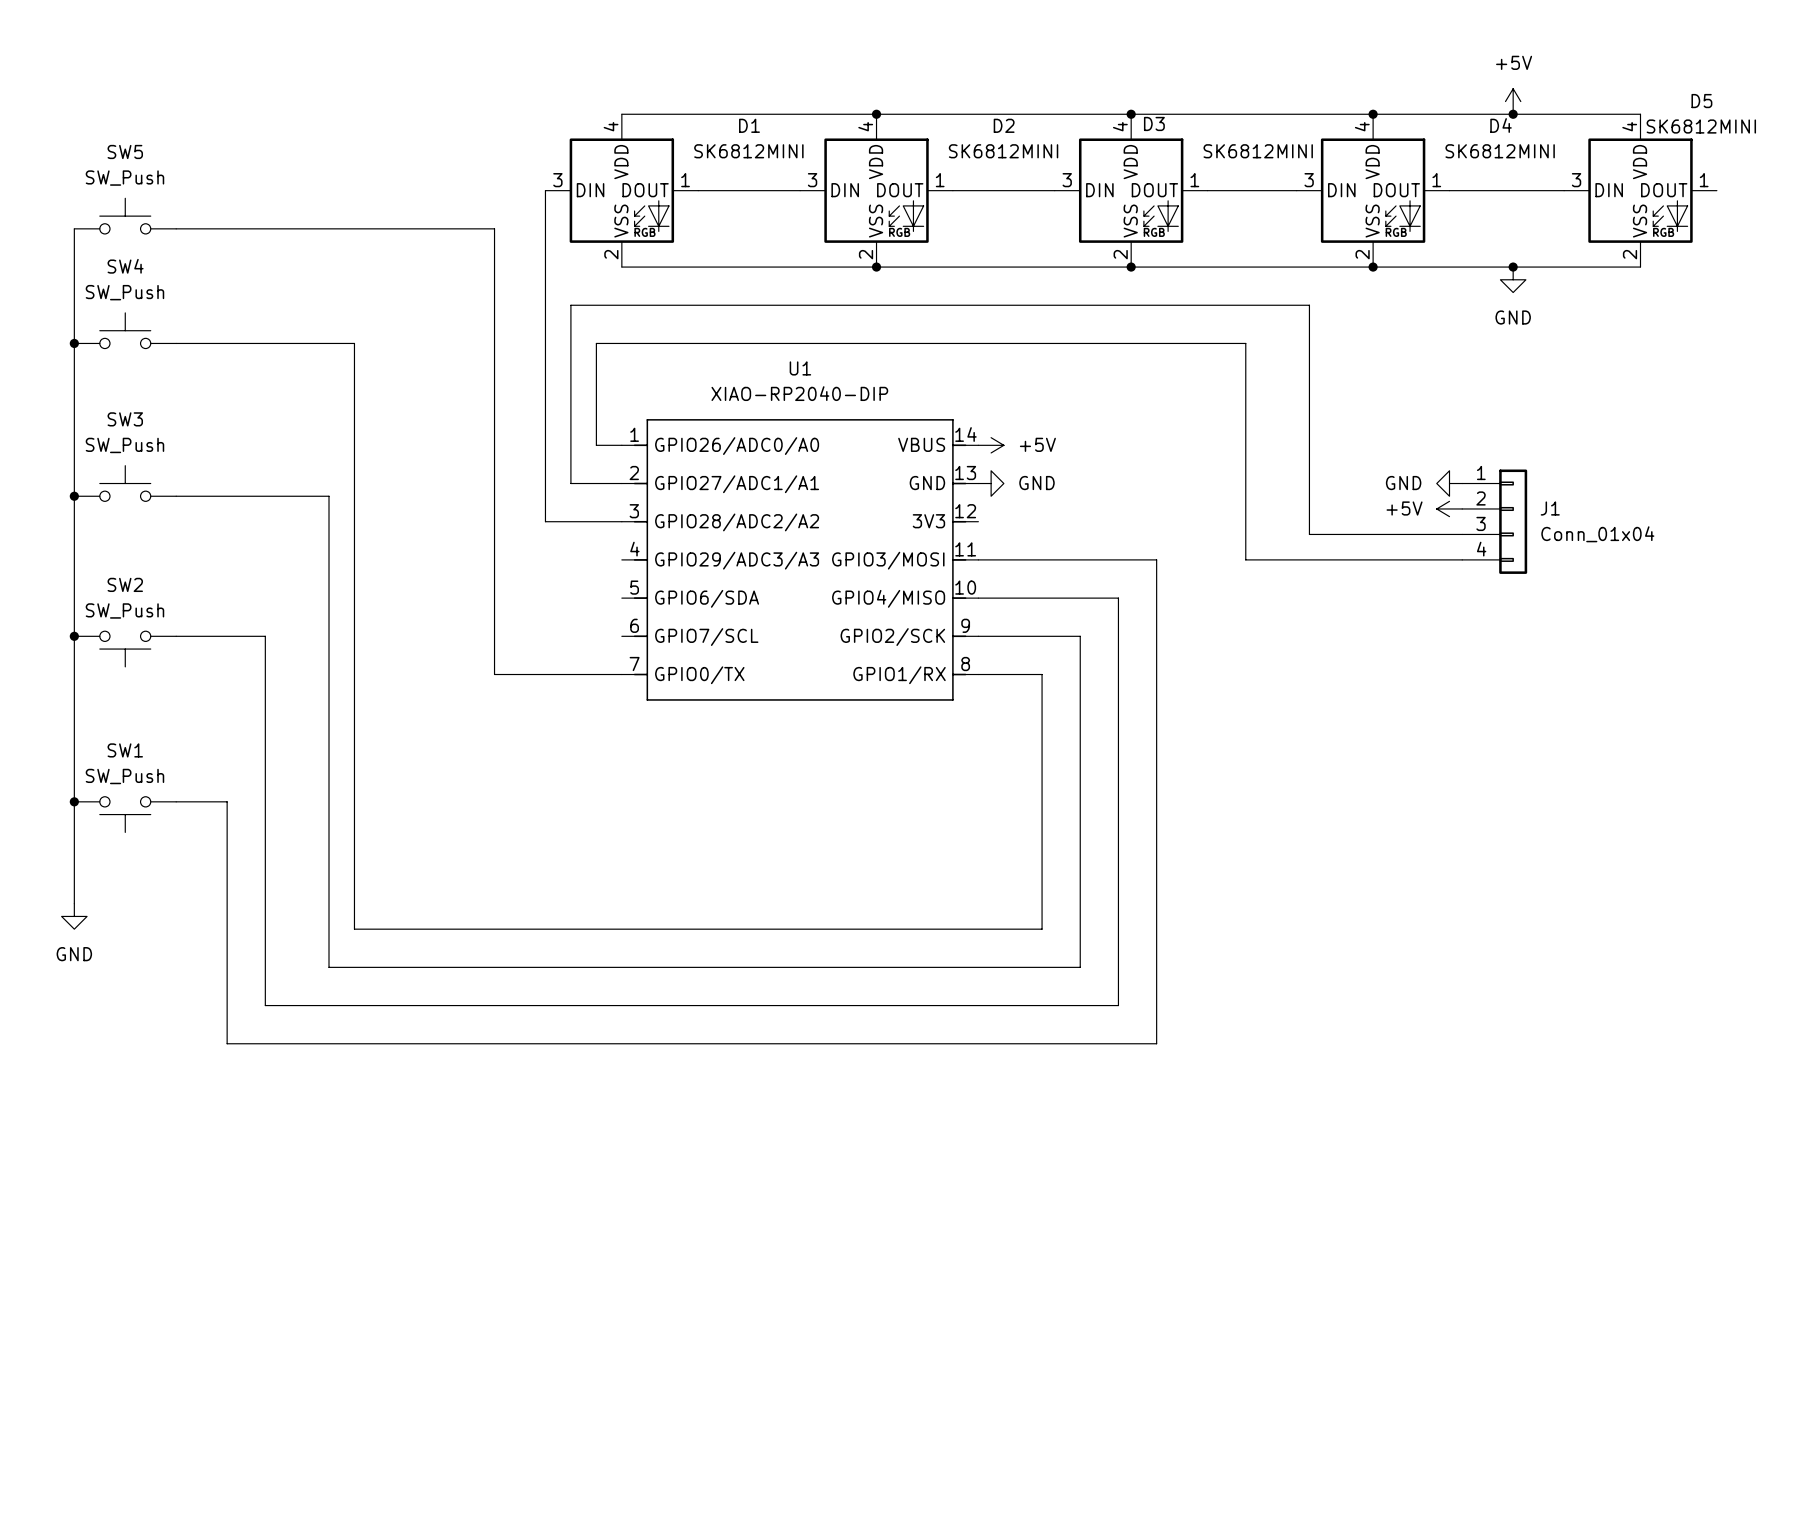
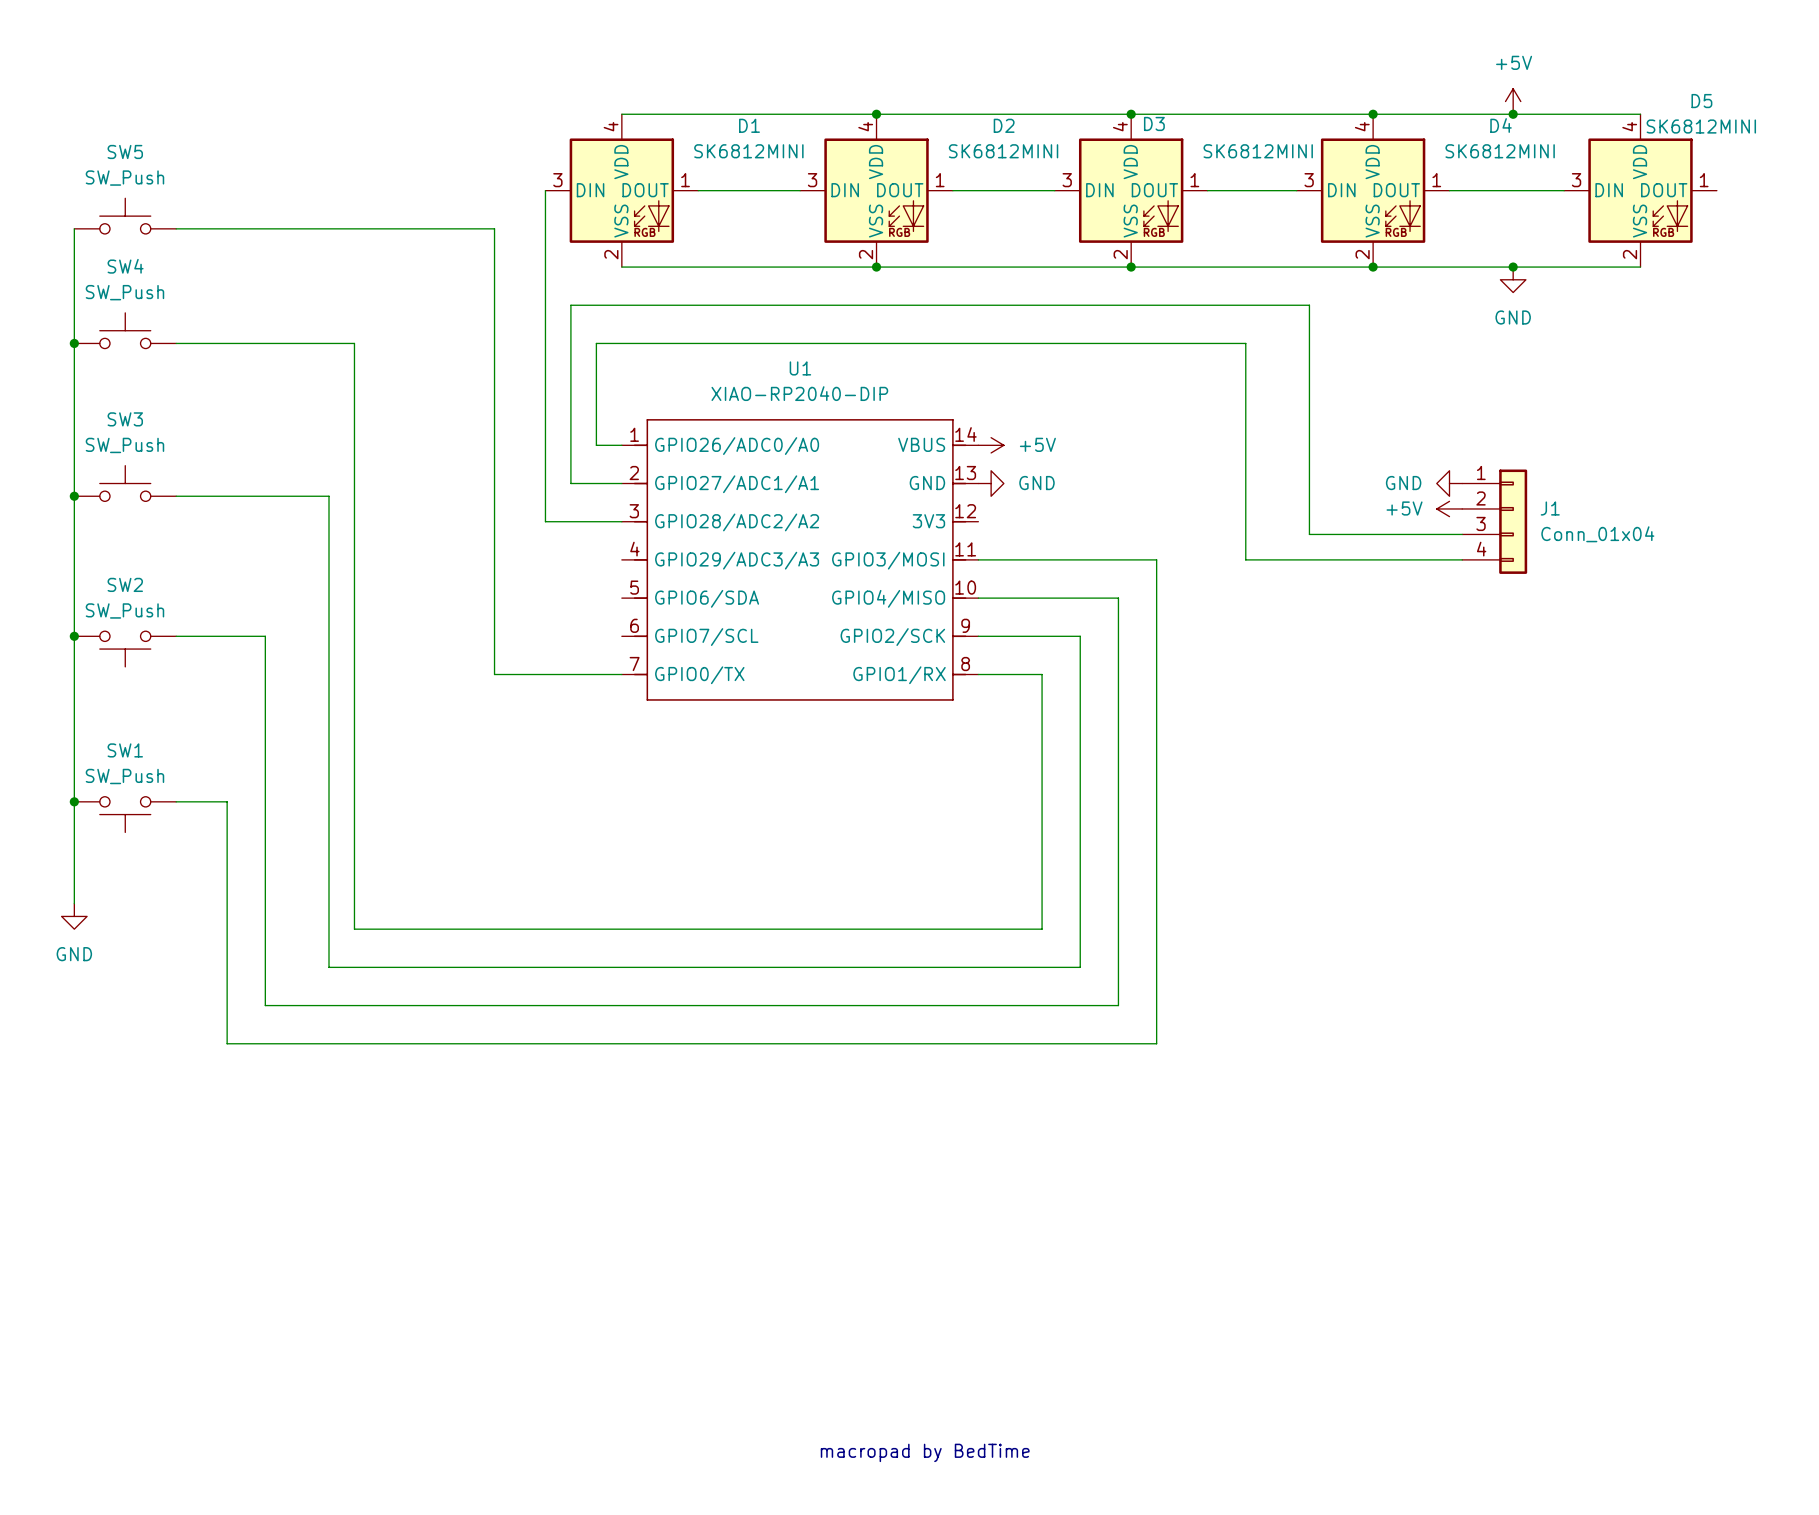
text: none -> macropad by BedTime (925, 1452)

